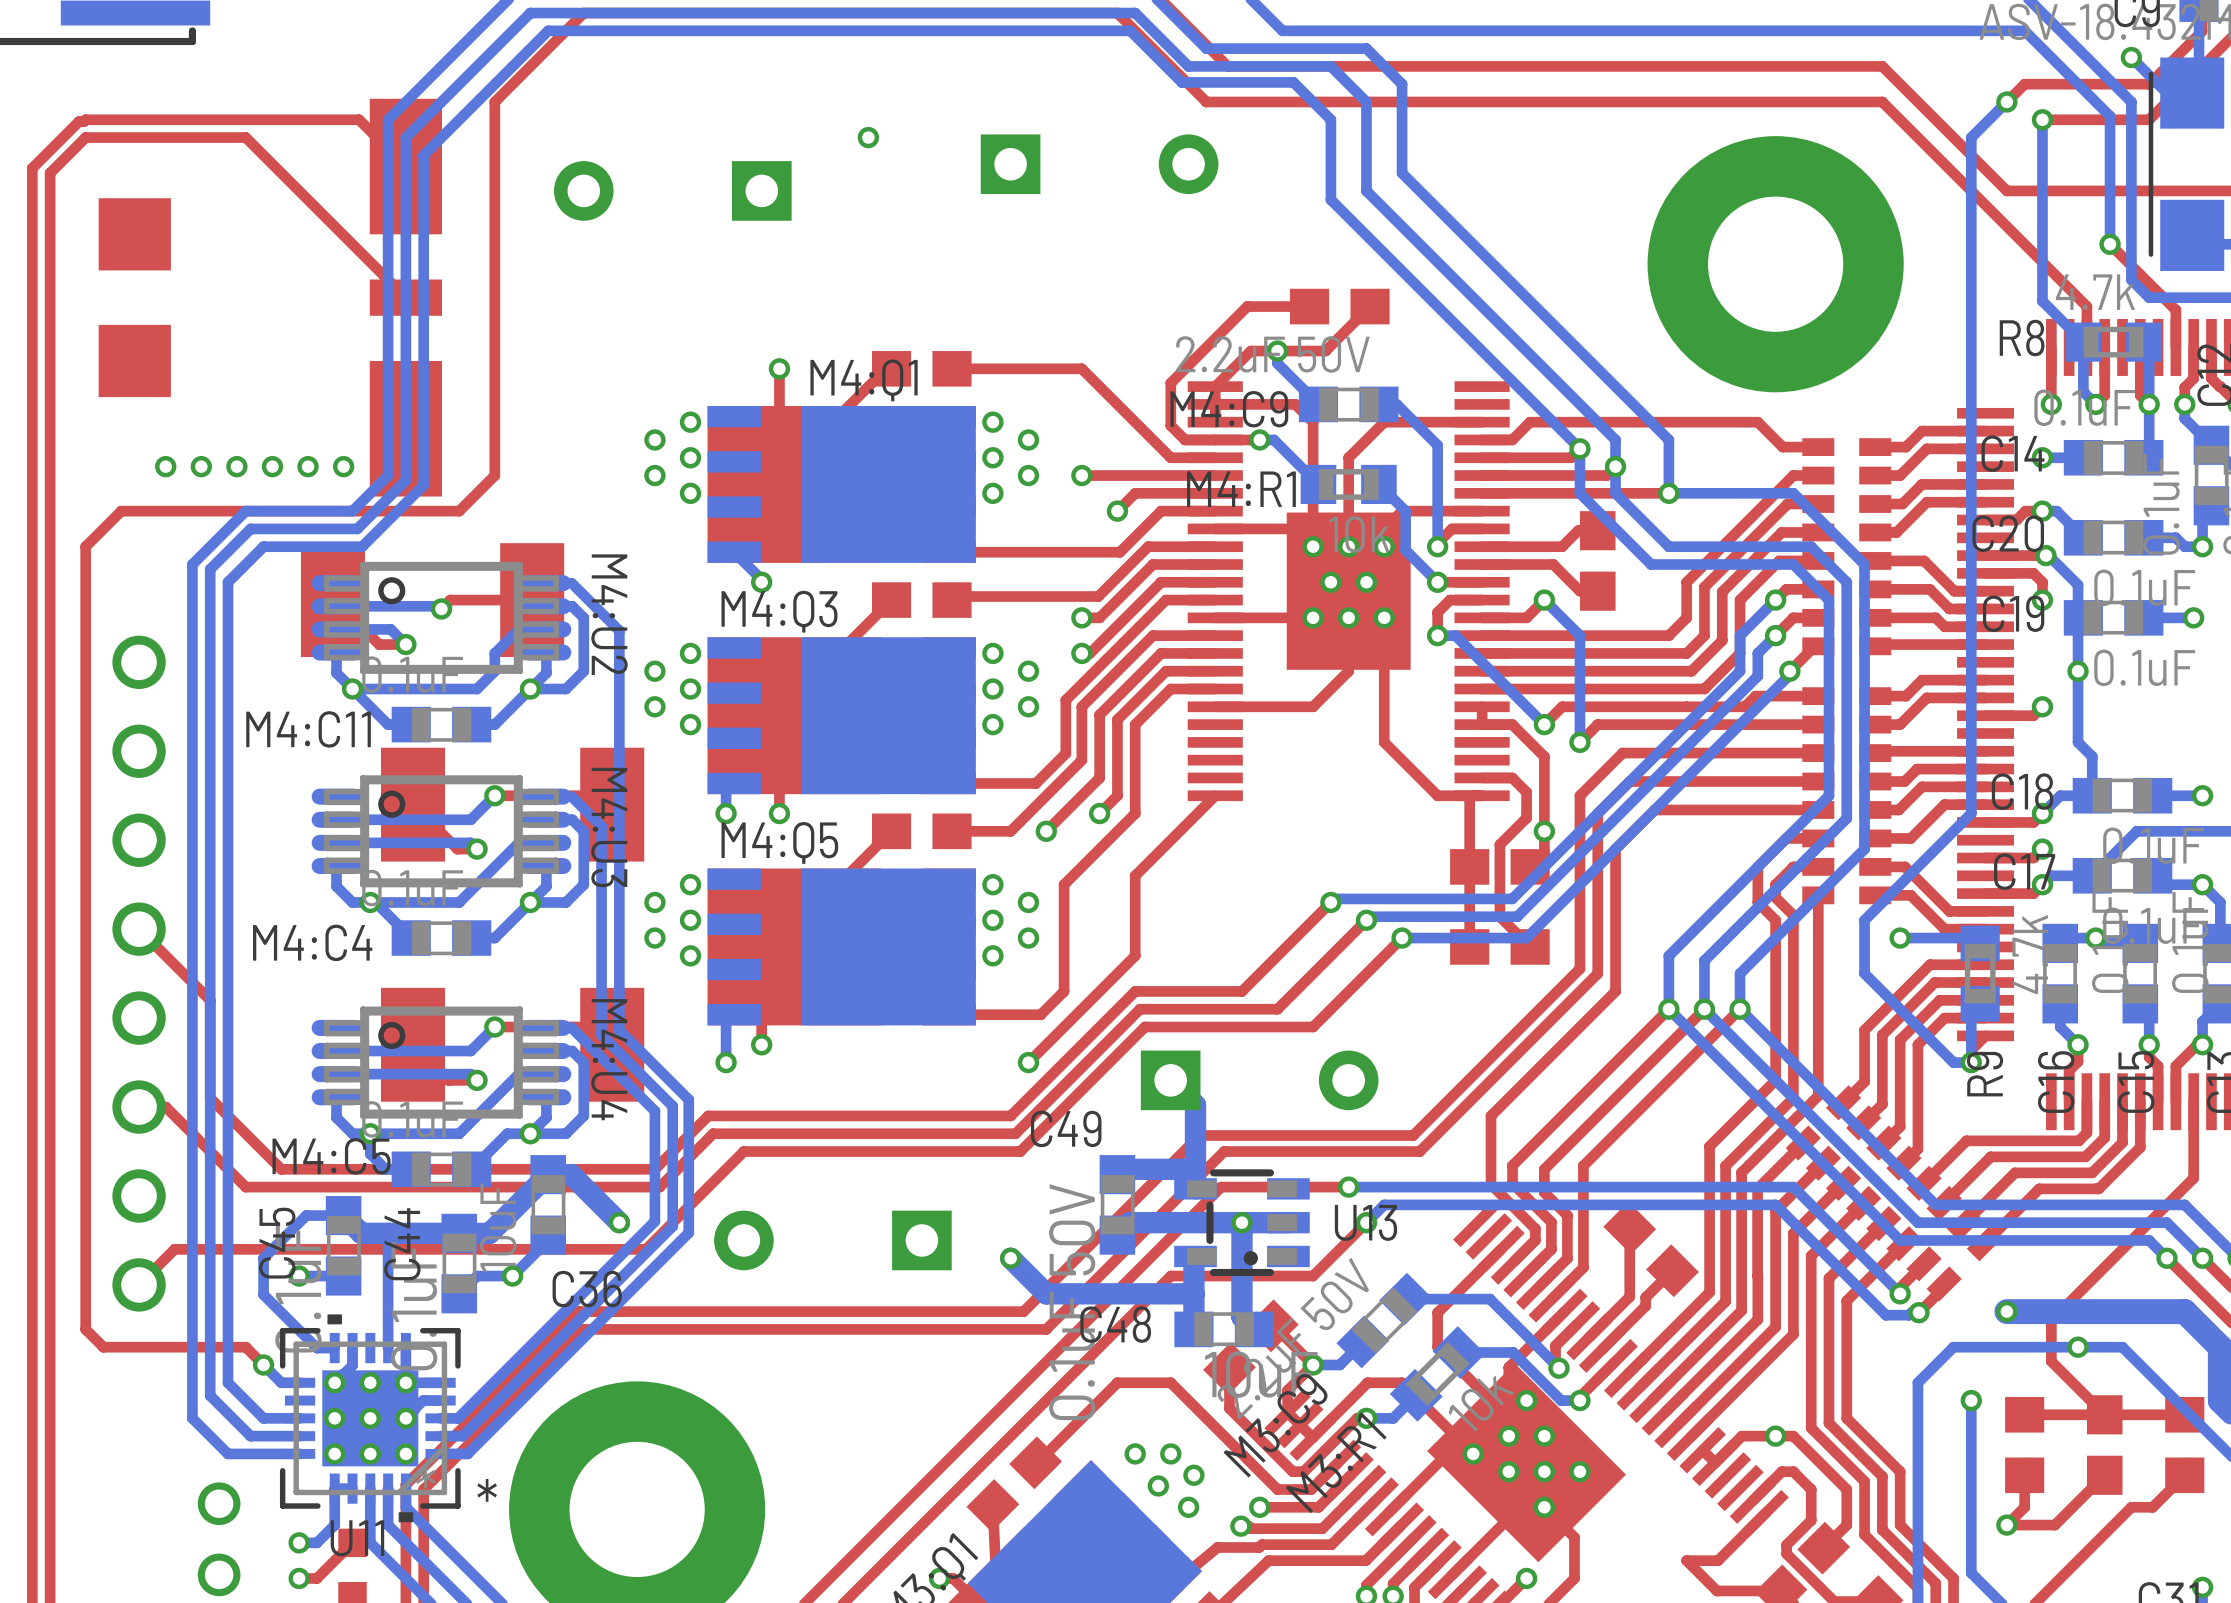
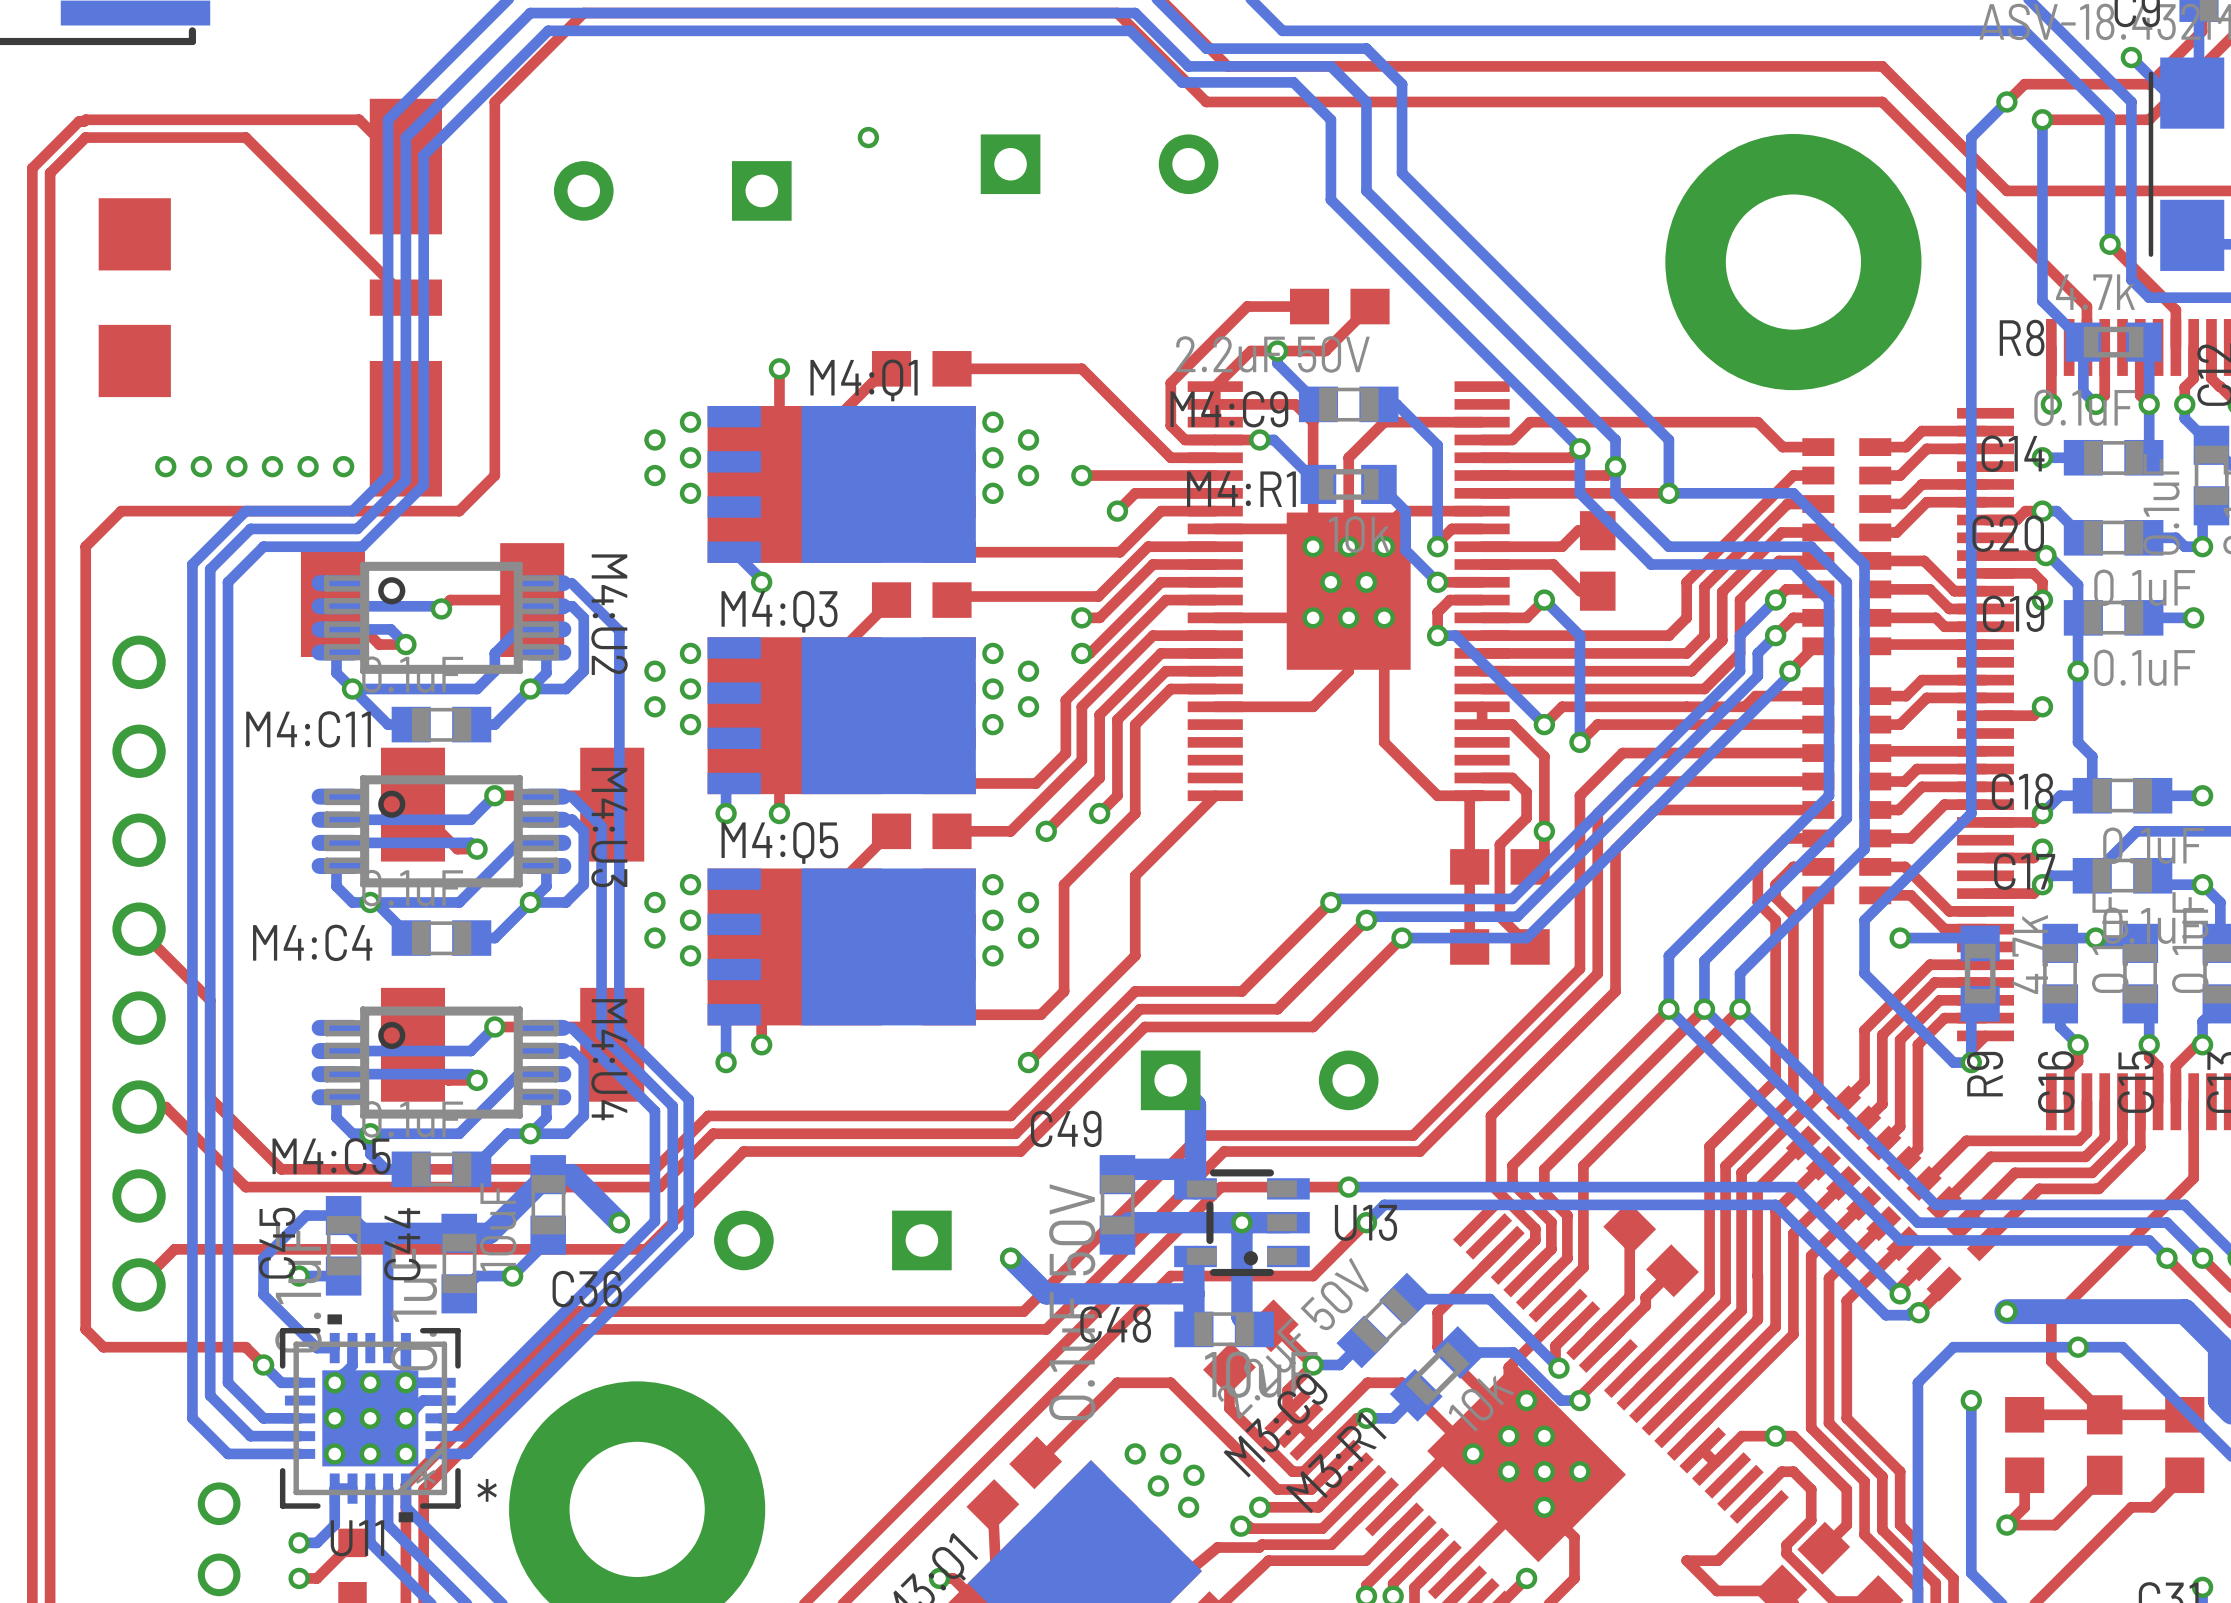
via position: (1775, 264) -> (1793, 262)

